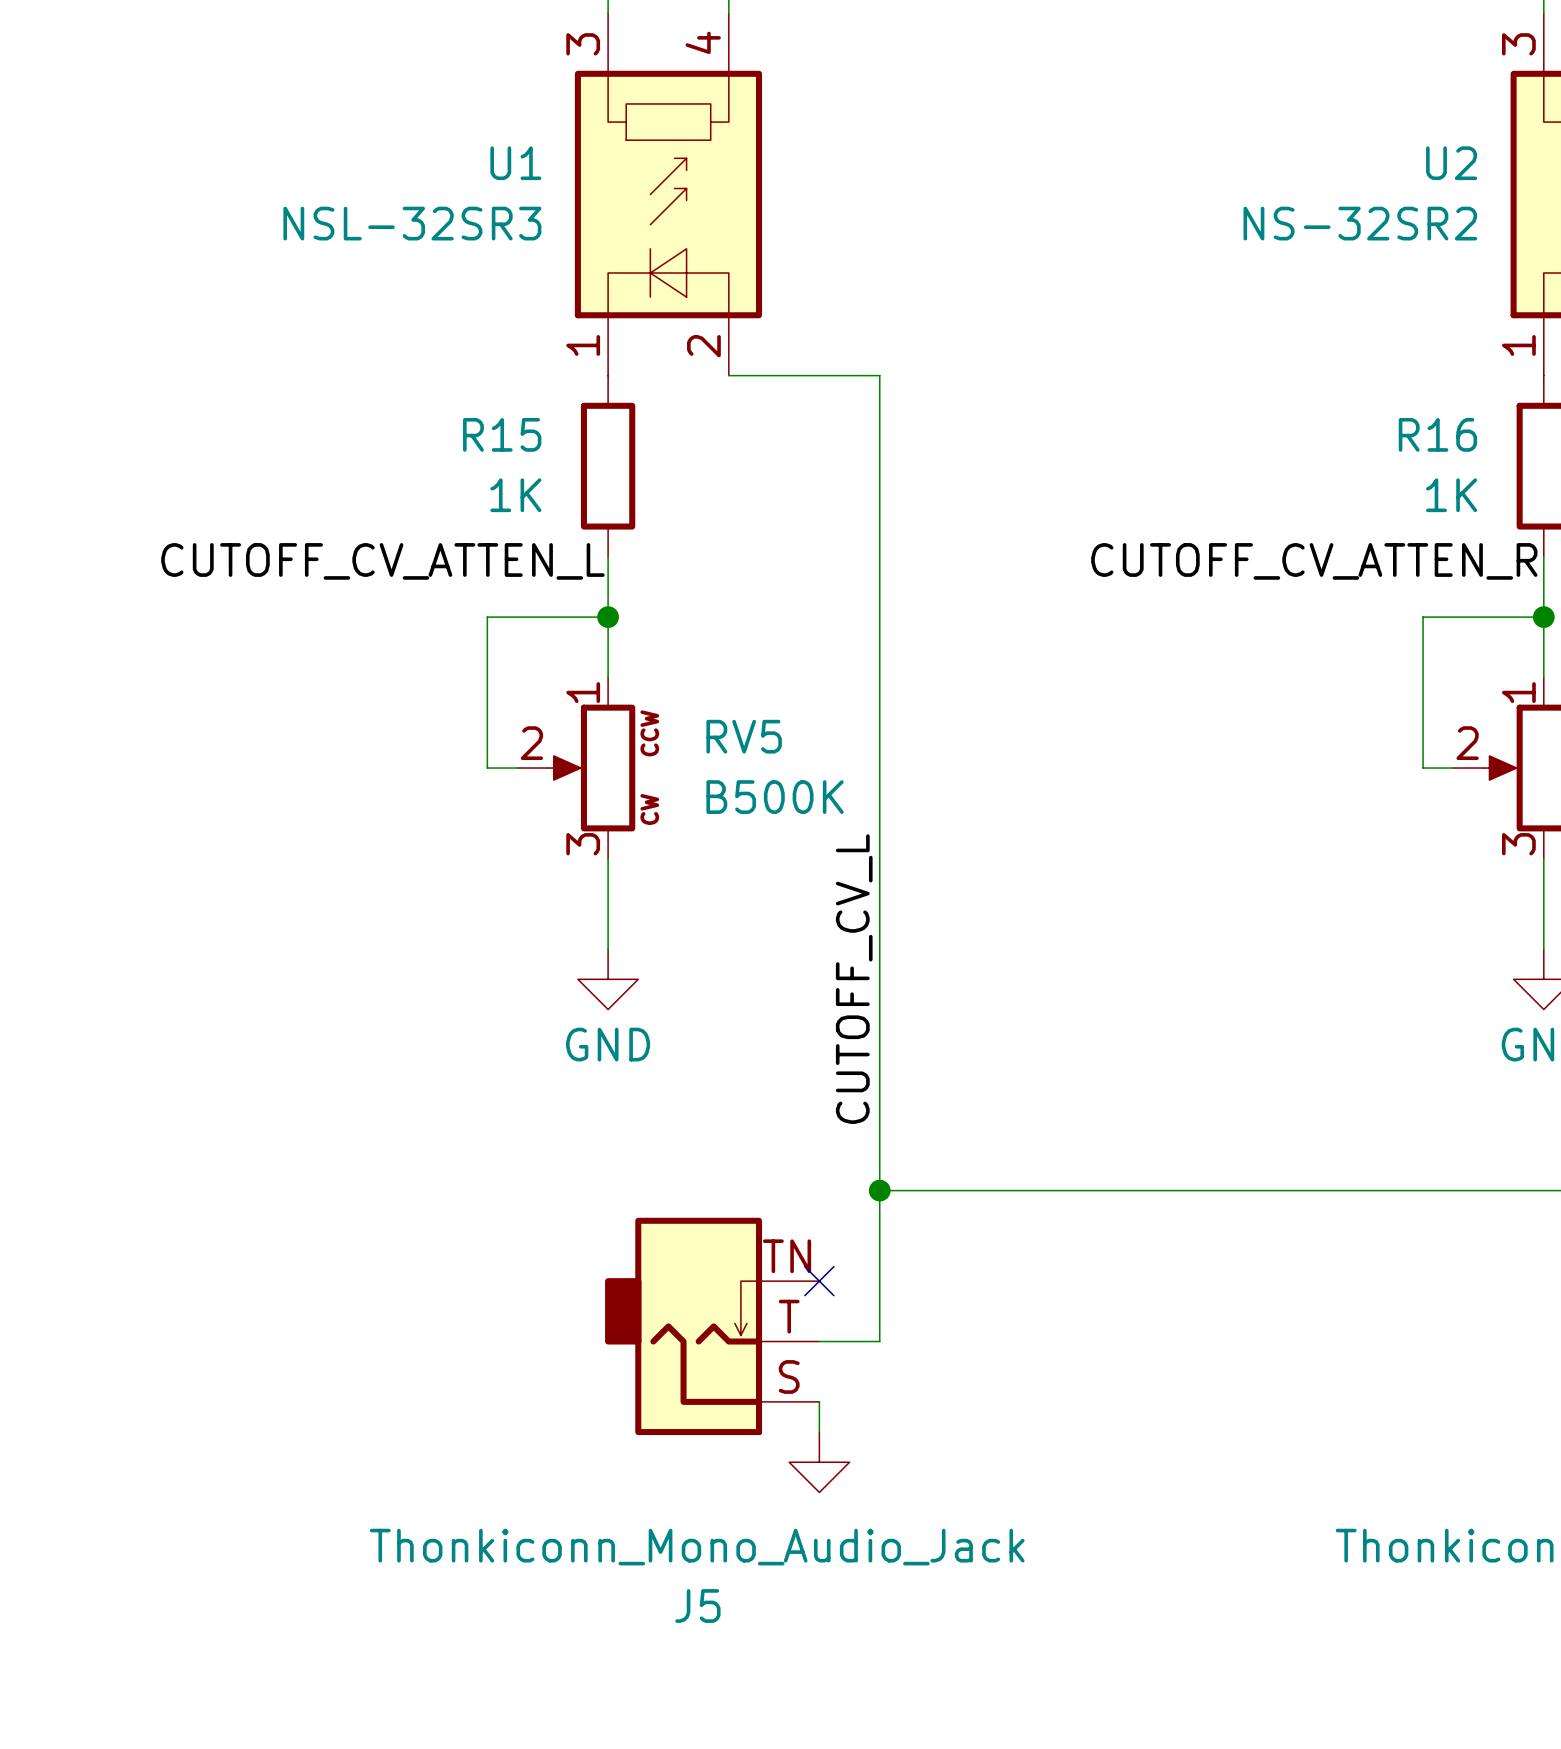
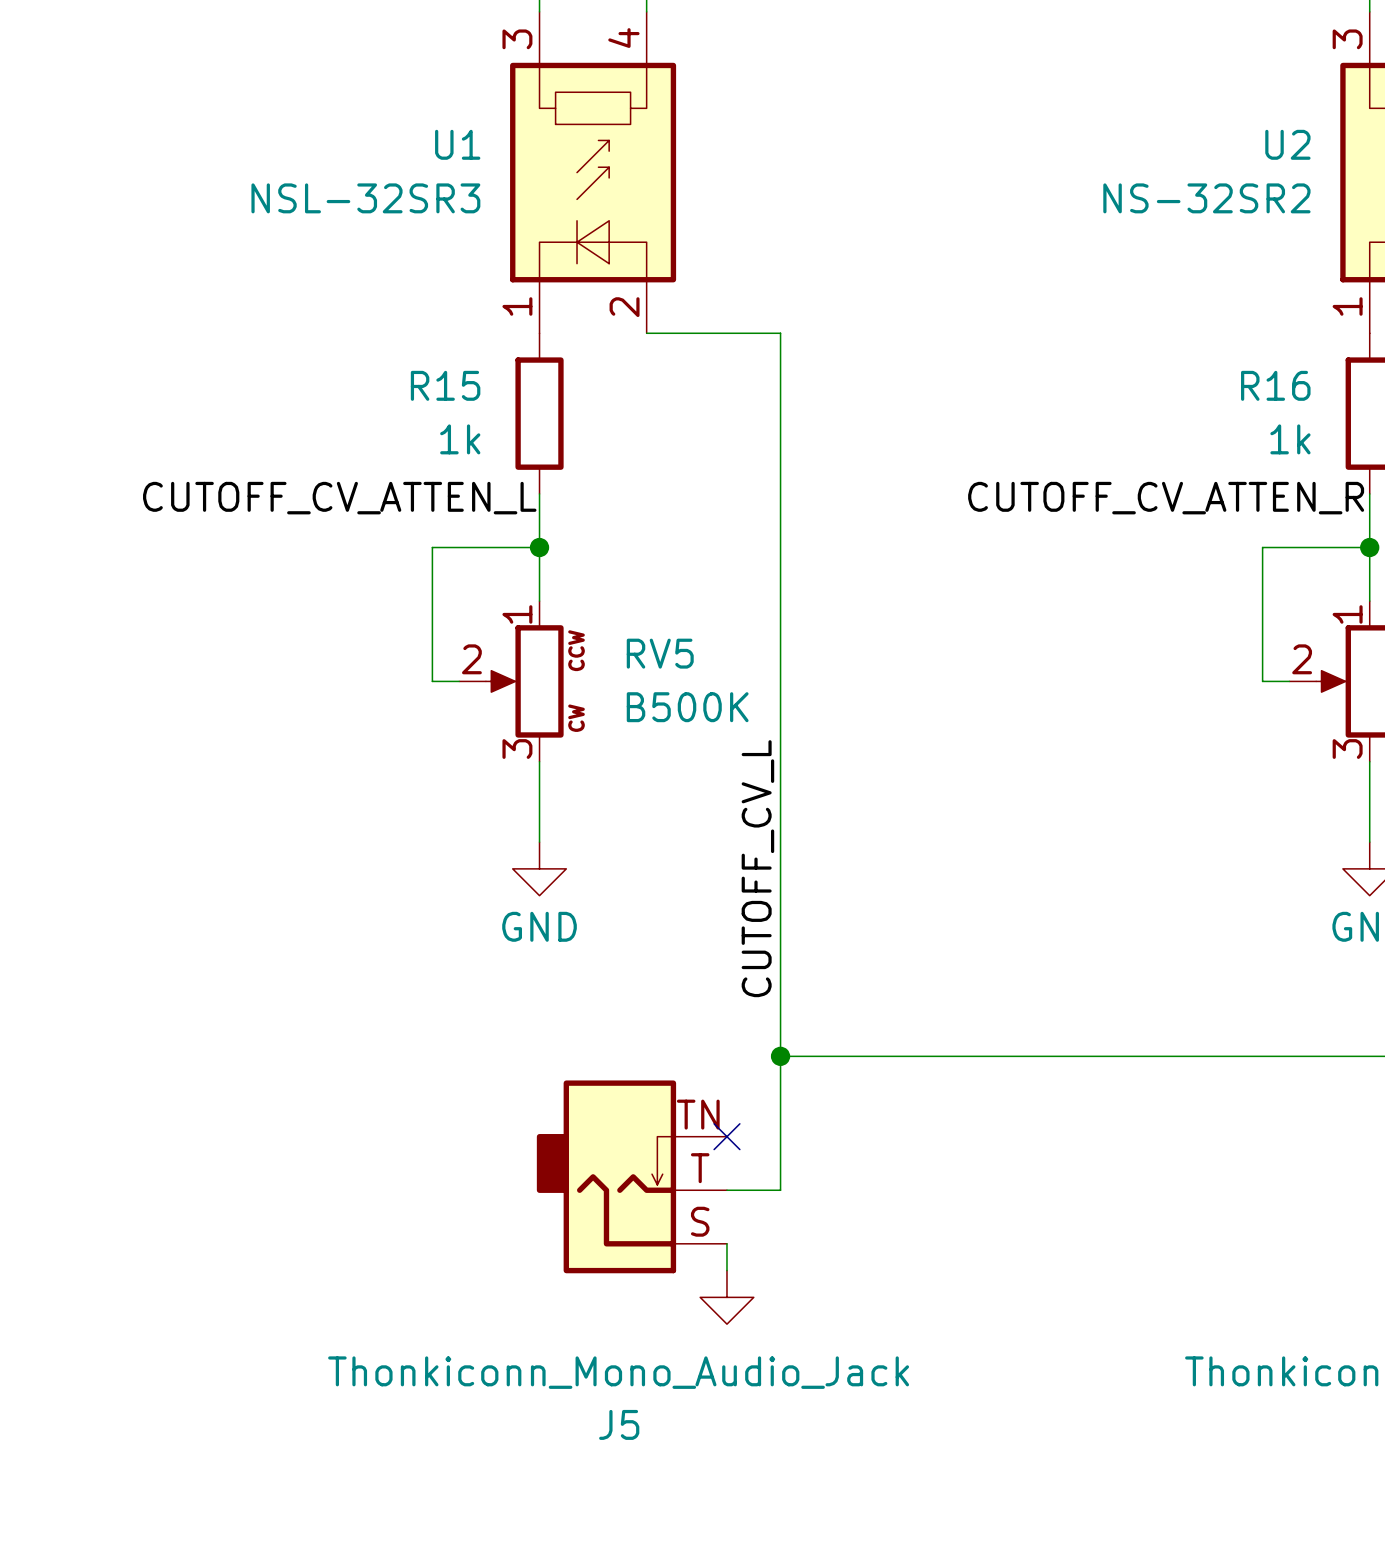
R15 text: 1K (515, 495) -> 1k (460, 439)
R16 text: 1K (1451, 495) -> 1k (1290, 439)

